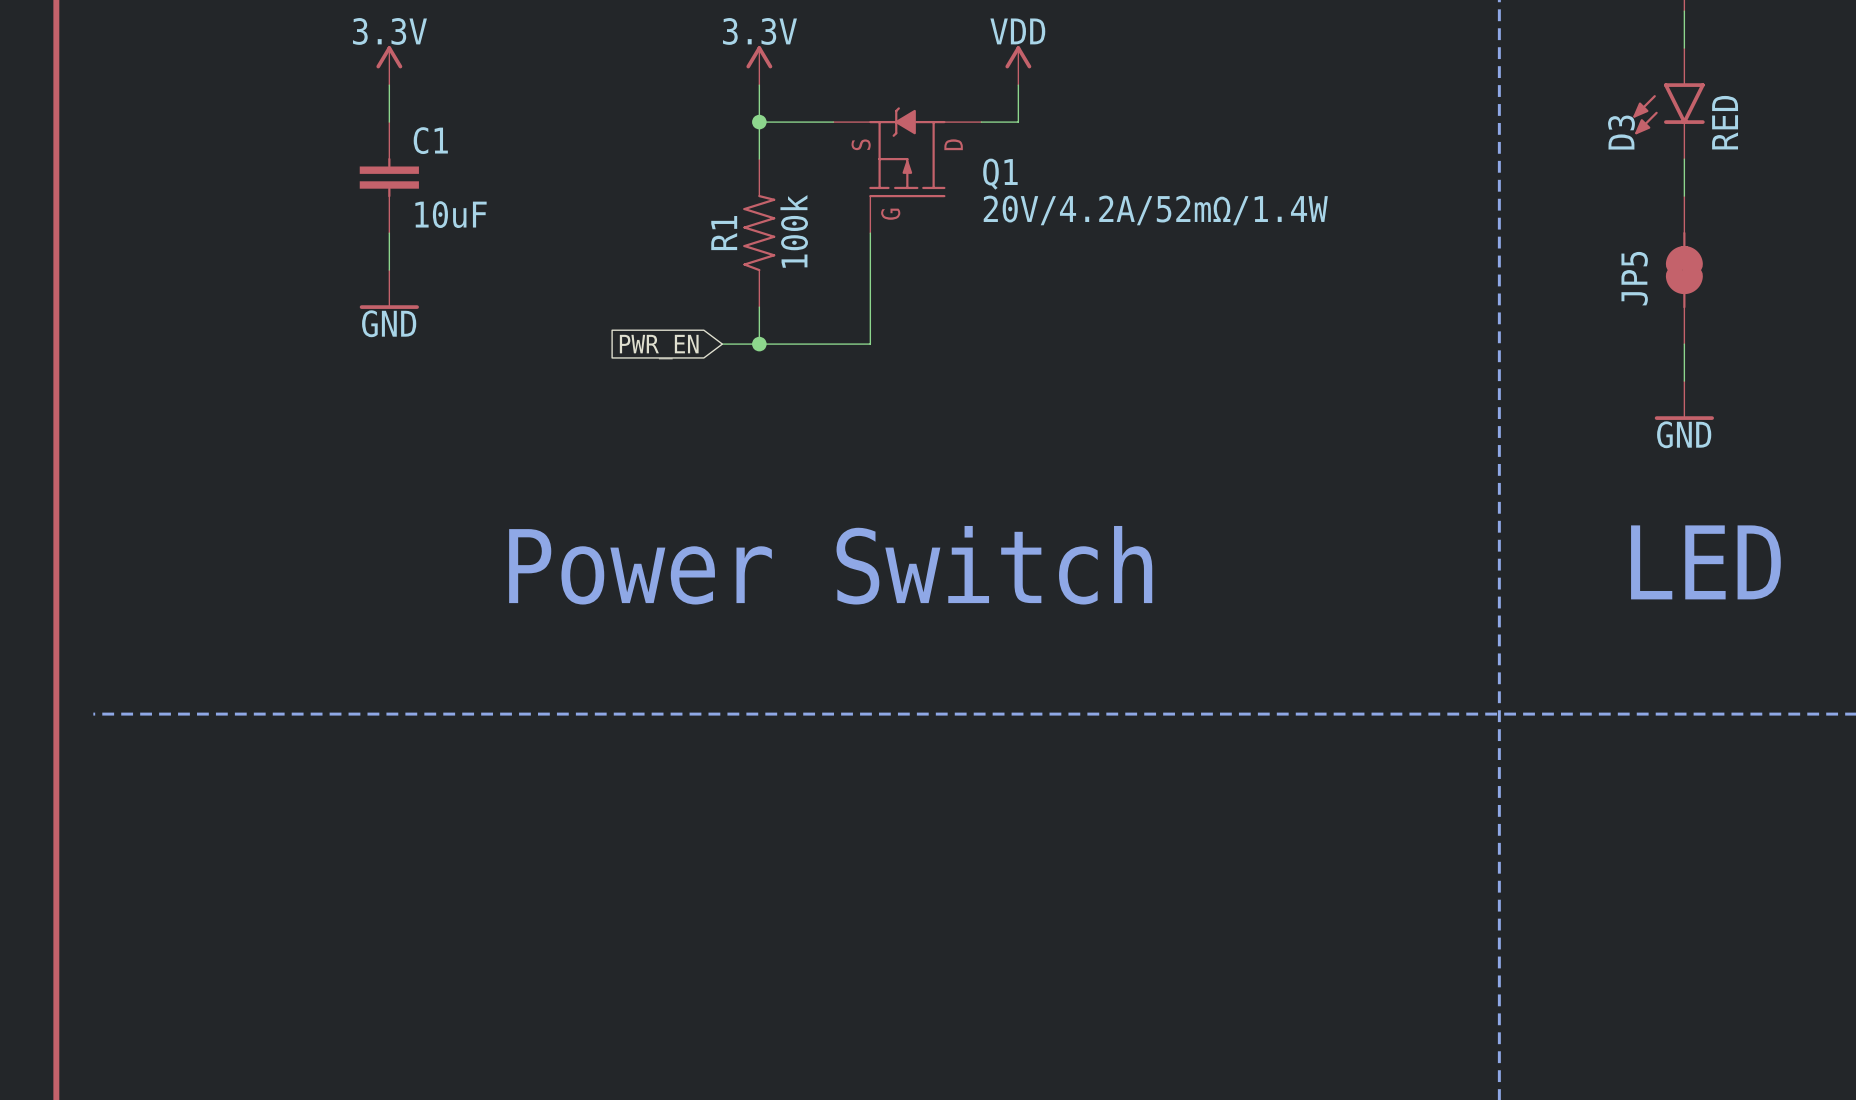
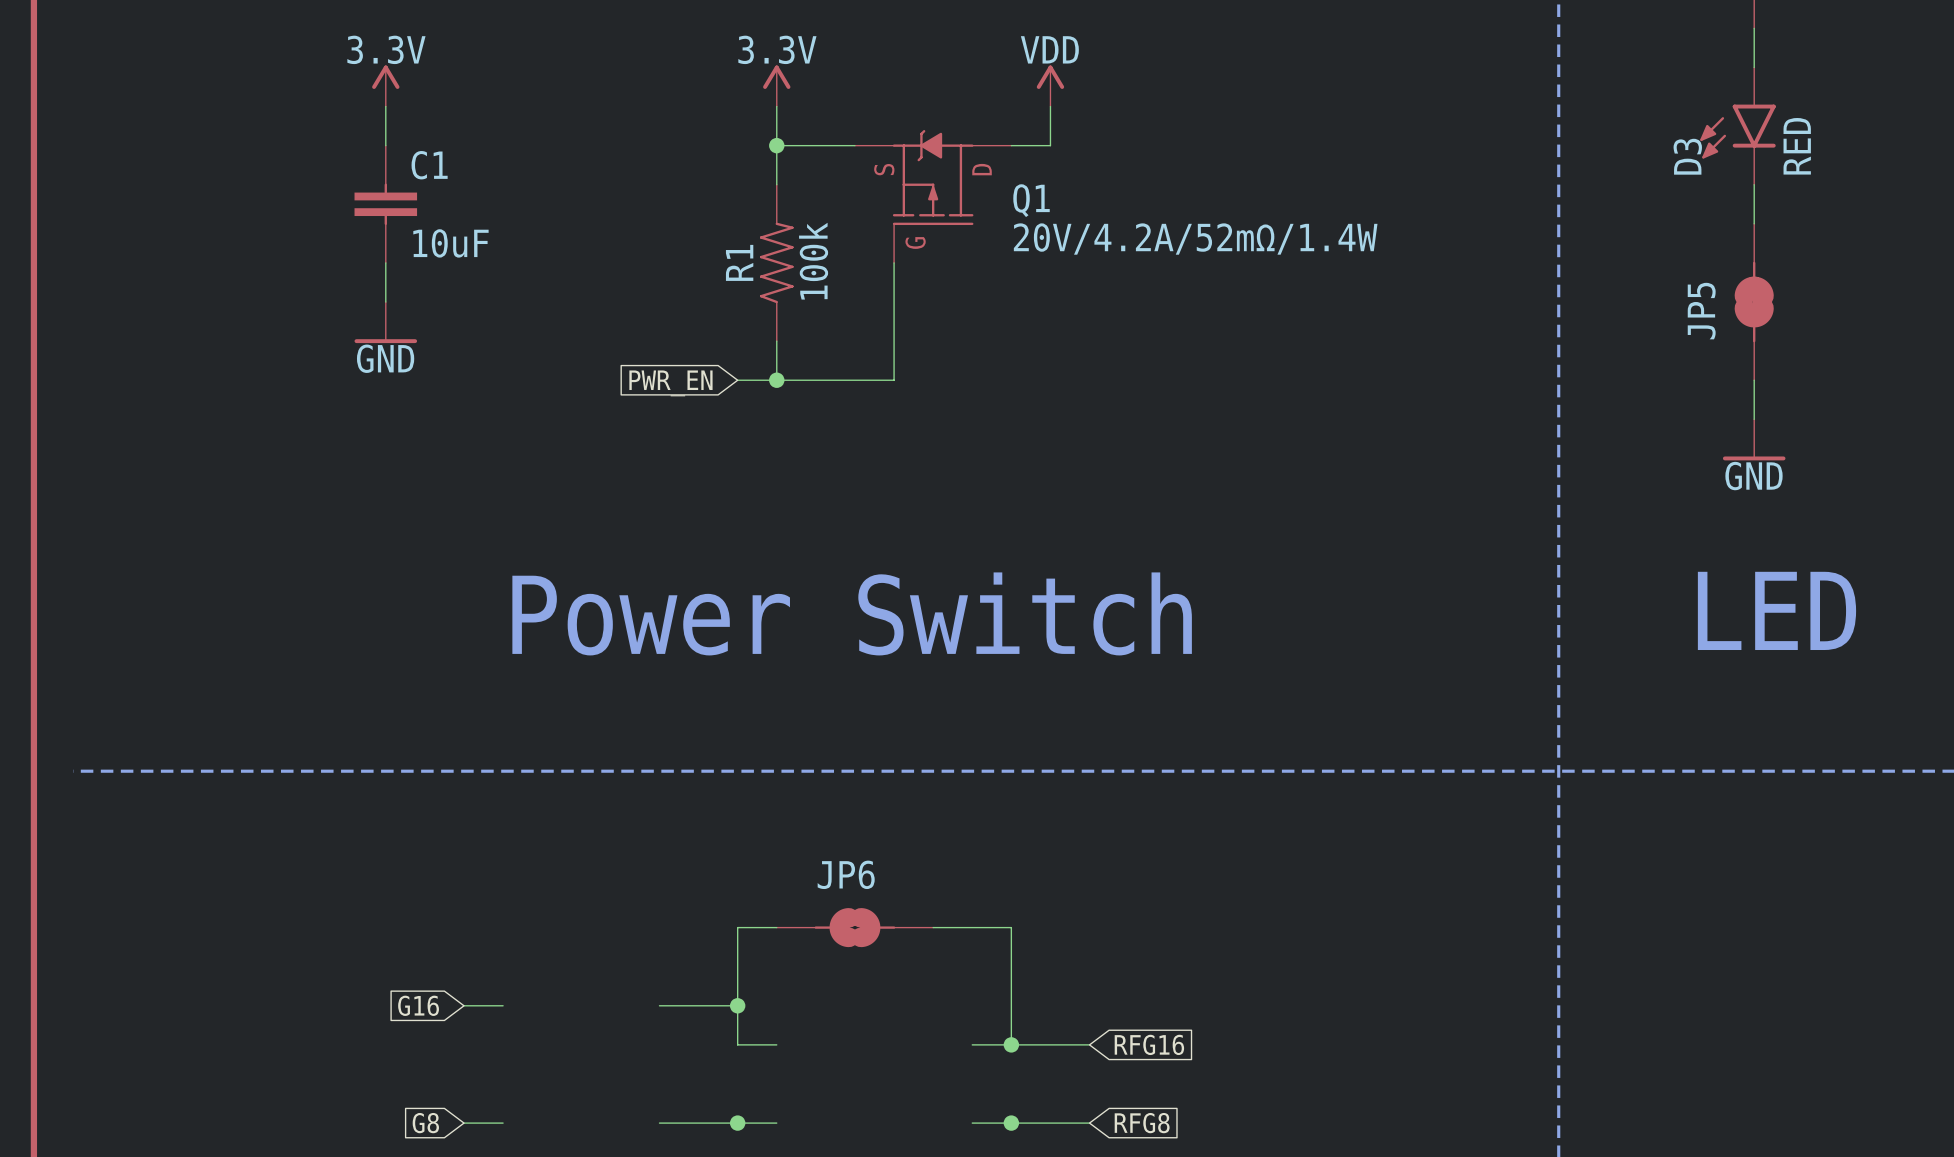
wire: none -> (776, 927) (737, 927) (737, 1044) (776, 1044)
JP6: none -> (854, 927)
wire: none -> (933, 927) (1011, 927) (1011, 1044)
global label: none -> G16 (418, 1005)
wire: none -> (463, 1005) (503, 1005)
wire: none -> (659, 1005) (737, 1005)
junction: none -> (737, 1005)
wire: none -> (972, 1044) (1089, 1044)
junction: none -> (1011, 1044)
global label: none -> RFG16 (1149, 1044)
global label: none -> G8 (425, 1123)
wire: none -> (463, 1123) (503, 1123)
wire: none -> (659, 1123) (776, 1123)
junction: none -> (737, 1123)
wire: none -> (972, 1123) (1089, 1123)
junction: none -> (1011, 1123)
global label: none -> RFG8 (1142, 1123)

